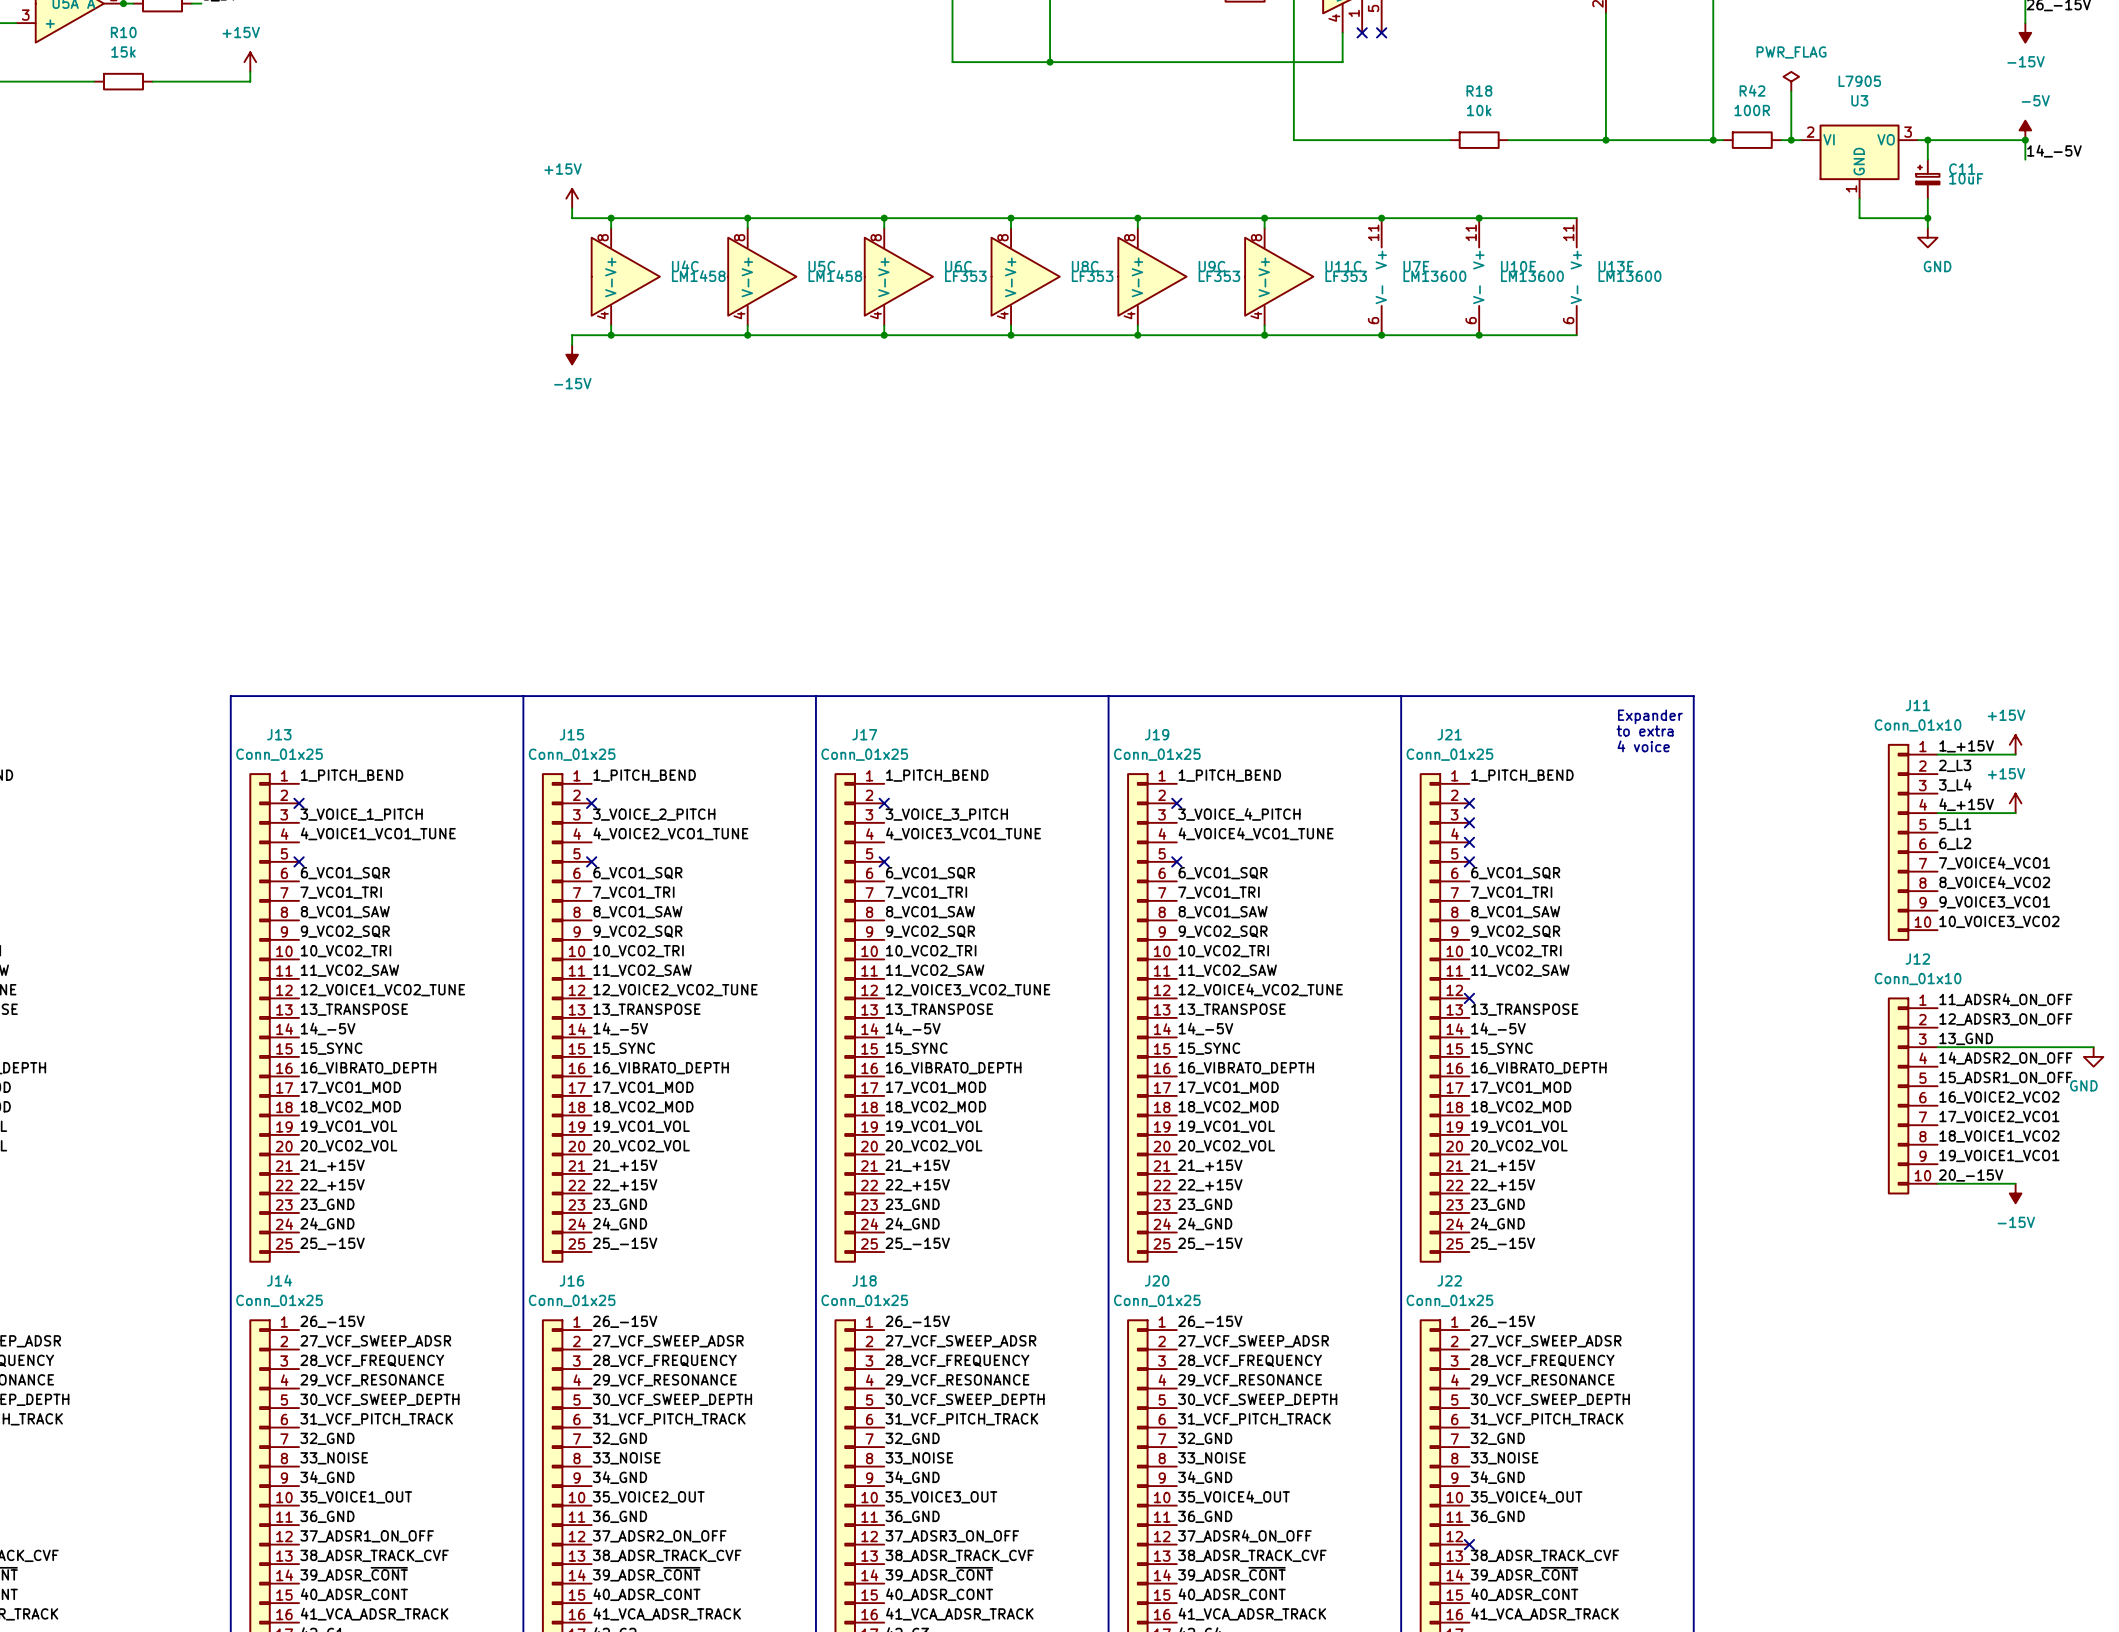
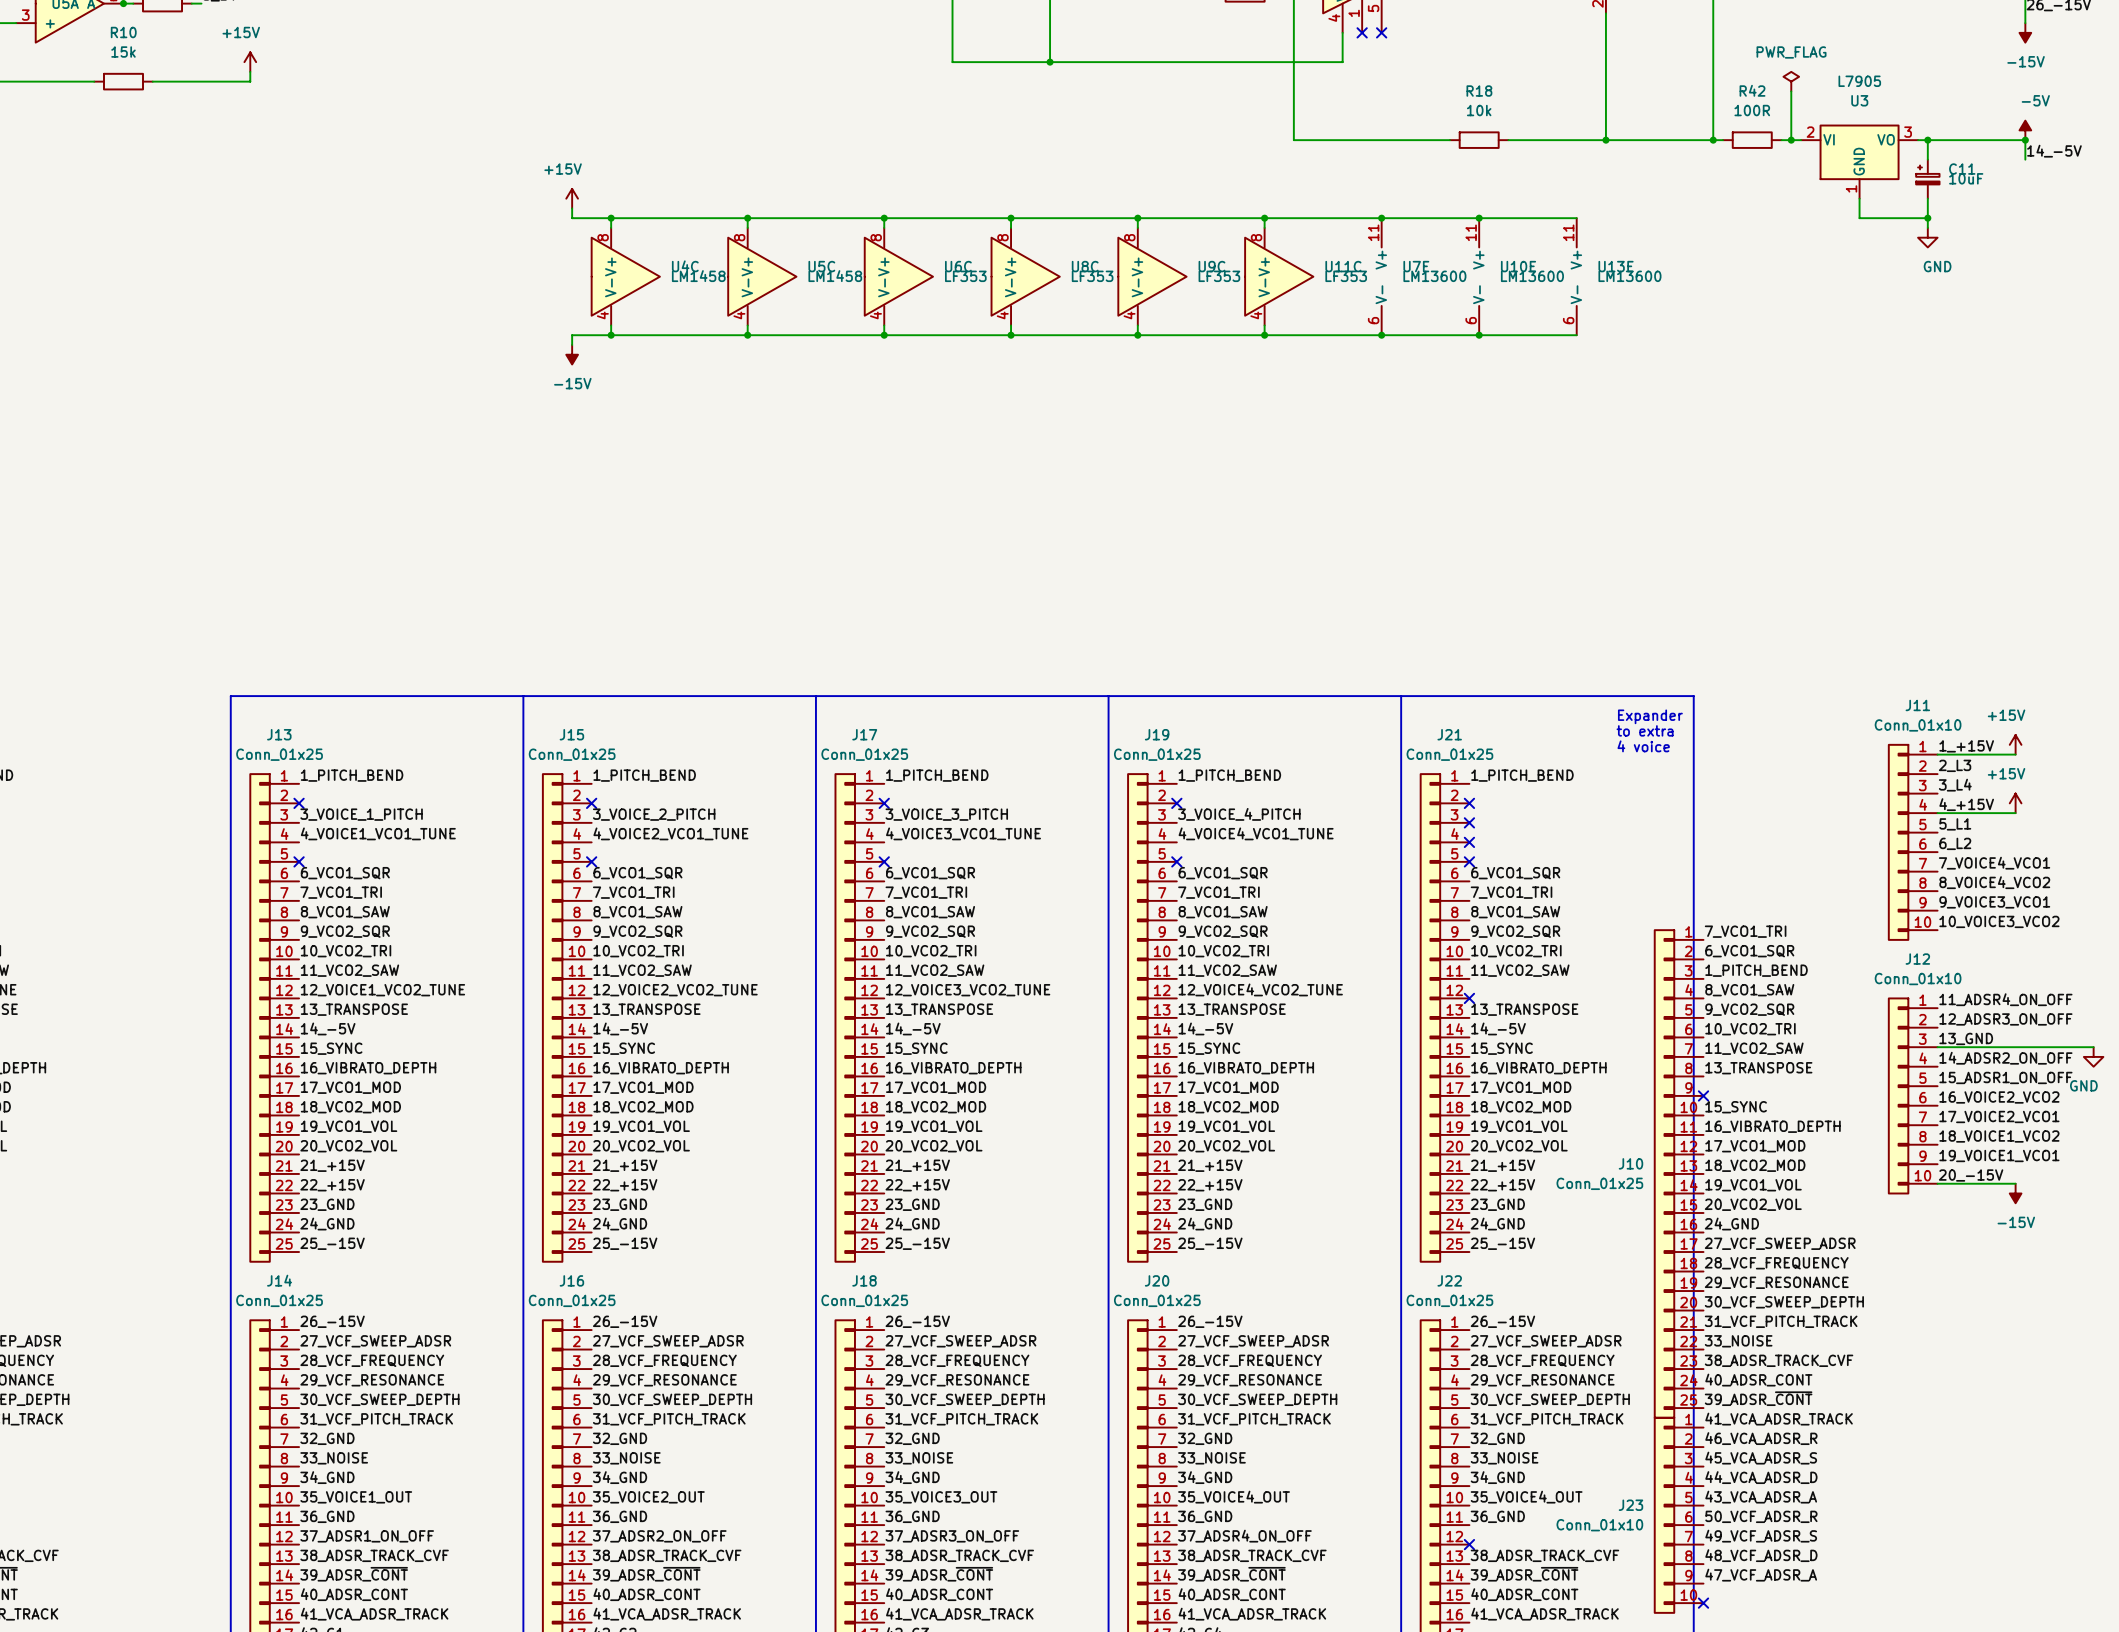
label: none -> 7_VCO1_TRI (1745, 931)
label: none -> 6_VCO1_SQR (1749, 951)
label: none -> 1_PITCH_BEND (1756, 970)
label: none -> 8_VCO1_SAW (1749, 990)
label: none -> 9_VCO2_SQR (1749, 1009)
label: none -> 10_VCO2_TRI (1750, 1029)
label: none -> 11_VCO2_SAW (1754, 1048)
label: none -> 13_TRANSPOSE (1758, 1068)
no-connect mark: none -> (1703, 1095)
label: none -> 15_SYNC (1736, 1107)
label: none -> 16_VIBRATO_DEPTH (1773, 1126)
label: none -> 17_VCO1_MOD (1755, 1146)
label: none -> 18_VCO2_MOD (1755, 1165)
J10: none -> Conn_01x25 (1678, 1173)
label: none -> 19_VCO1_VOL (1753, 1185)
label: none -> 20_VCO2_VOL (1753, 1204)
label: none -> 24_GND (1731, 1224)
label: none -> 27_VCF_SWEEP_ADSR (1780, 1243)
label: none -> 28_VCF_FREQUENCY (1776, 1263)
label: none -> 29_VCF_RESONANCE (1776, 1282)
label: none -> 30_VCF_SWEEP_DEPTH (1784, 1302)
label: none -> 31_VCF_PITCH_TRACK (1781, 1321)
label: none -> 33_NOISE (1738, 1341)
label: none -> 38_ADSR_TRACK_CVF (1779, 1360)
label: none -> 40_ADSR_CONT (1758, 1380)
label: none -> 39_ADSR_~{CONT} (1758, 1398)
label: none -> 41_VCA_ADSR_TRACK (1779, 1419)
label: none -> 46_VCA_ADSR_R (1761, 1438)
label: none -> 45_VCA_ADSR_S (1761, 1458)
label: none -> 44_VCA_ADSR_D (1761, 1477)
label: none -> 43_VCA_ADSR_A (1761, 1497)
J23: none -> Conn_01x10 (1678, 1515)
label: none -> 50_VCF_ADSR_R (1761, 1516)
label: none -> 49_VCF_ADSR_S (1761, 1536)
label: none -> 48_VCF_ADSR_D (1761, 1555)
label: none -> 47_VCF_ADSR_A (1761, 1575)
no-connect mark: none -> (1703, 1603)

